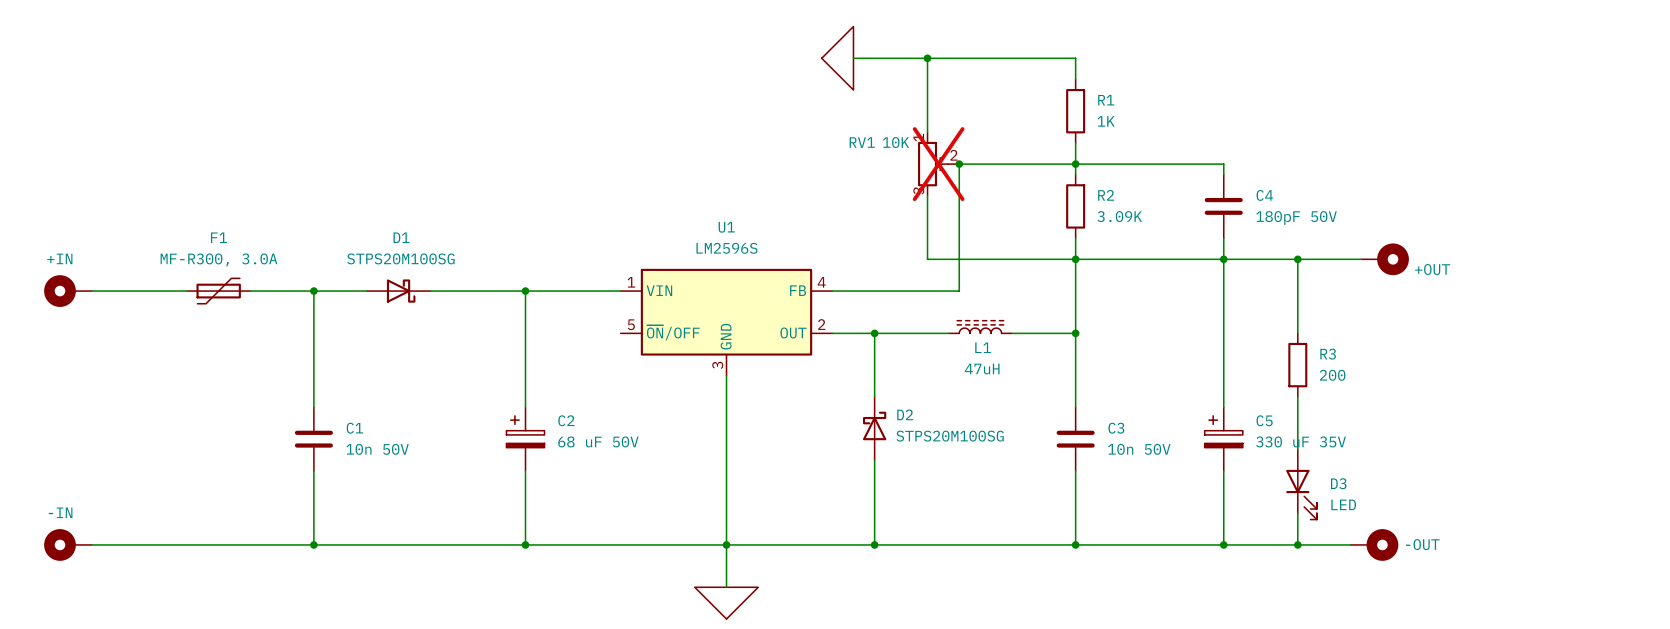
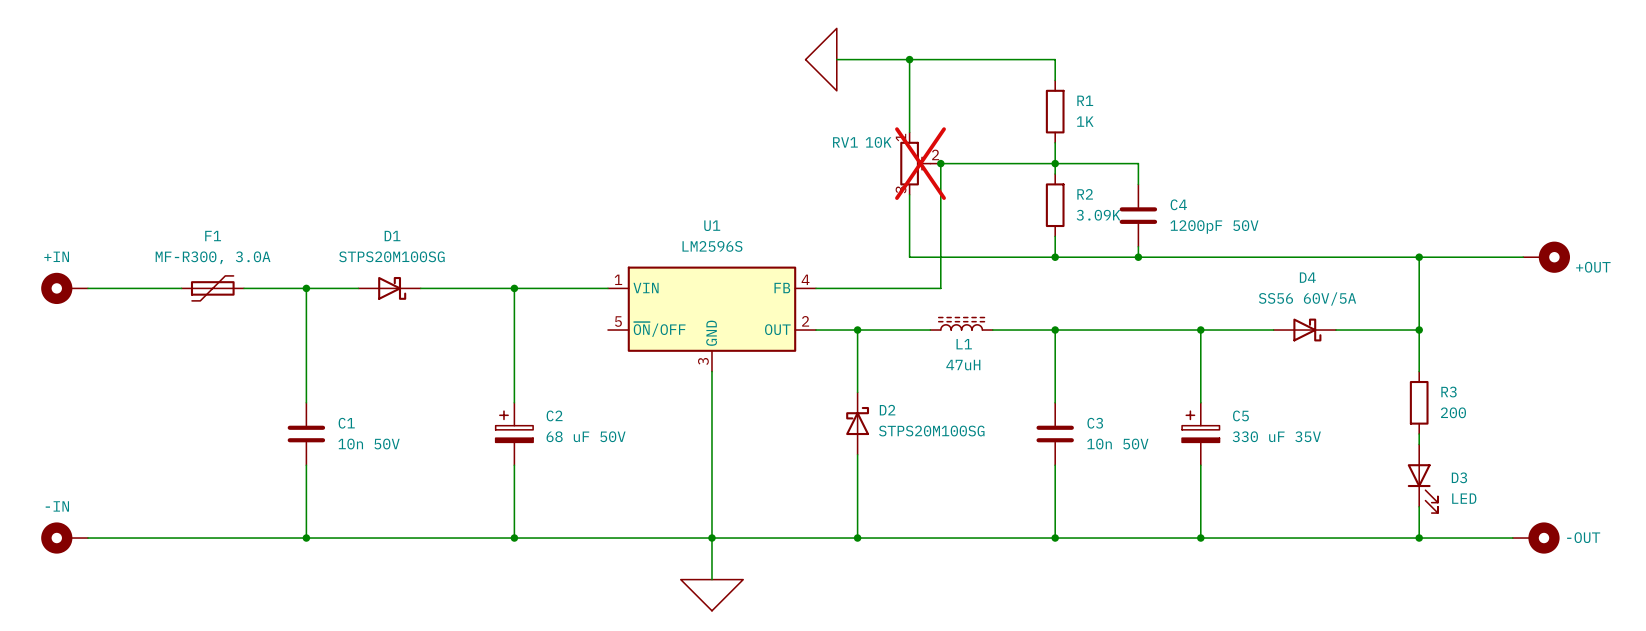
wire: (1160, 164) (1223, 164) (1223, 174) -> (1138, 163) (1138, 184)
C4 position: (1223, 206) -> (1138, 215)
C4 value: 180pF 50V (1296, 218) -> 1200pF 50V (1214, 227)
wire: (1223, 238) (1223, 333) -> none
wire: none -> (1138, 246) (1138, 257)
wire: (1075, 259) (1075, 333) -> (1273, 330) (1055, 330)
junction: none -> (1138, 257)
junction: (1223, 259) -> none
wire: (1297, 259) (1297, 333) -> none
junction: (1297, 259) -> none
wire: none -> (1335, 257) (1523, 257)
part position: (1385, 259) -> (1546, 257)
wire: none -> (1419, 257) (1419, 371)
junction: none -> (1419, 257)
junction: none -> (1200, 330)
D4: none -> SS56 60V/5A (1304, 330)
wire: none -> (1335, 330) (1419, 330)
junction: none -> (1419, 330)
R3 position: (1297, 365) -> (1419, 402)
wire: (1297, 396) (1297, 449) -> none
wire: none -> (1419, 434) (1419, 444)
D3 position: (1301, 484) -> (1422, 478)
wire: (1297, 513) (1297, 544) -> (1419, 506) (1419, 538)
junction: (1297, 544) -> none
wire: none -> (1325, 538) (1512, 538)
part position: (1374, 544) -> (1536, 538)
junction: none -> (1419, 538)

